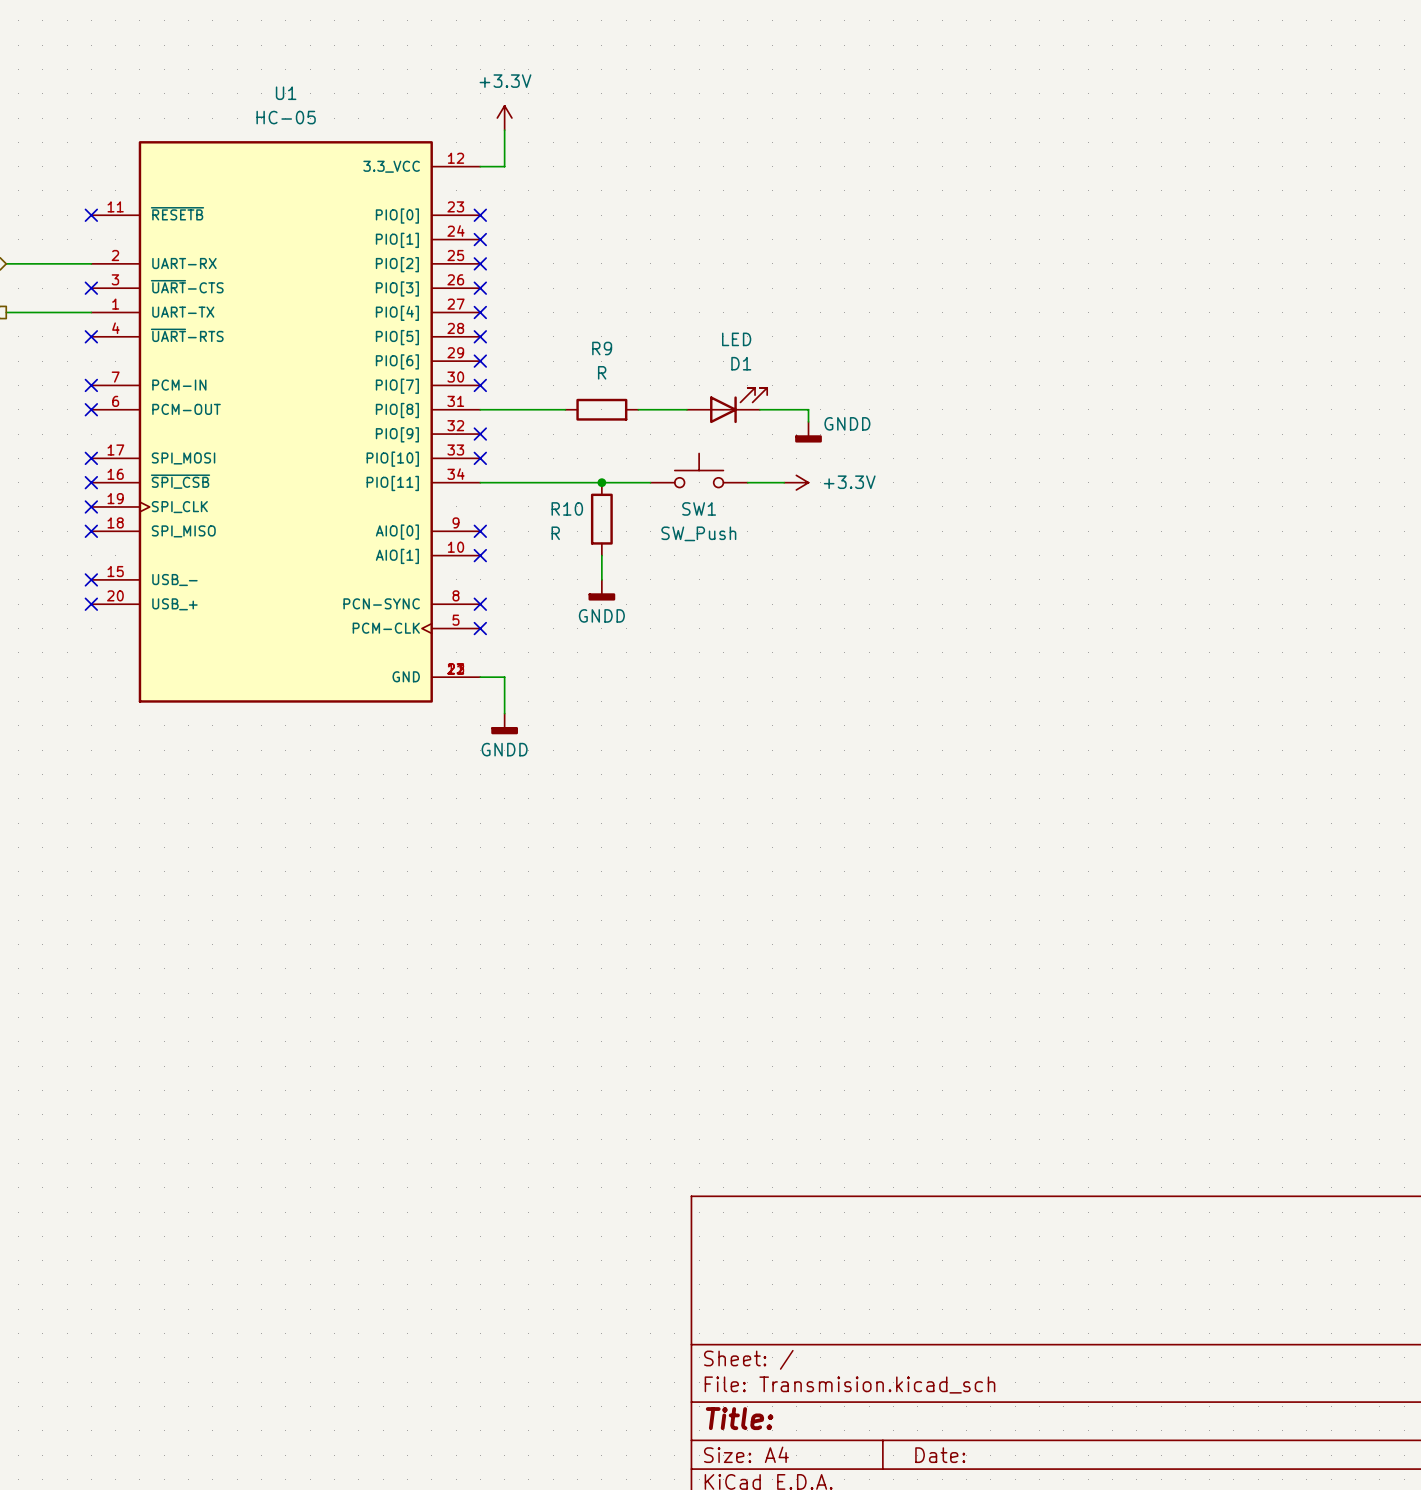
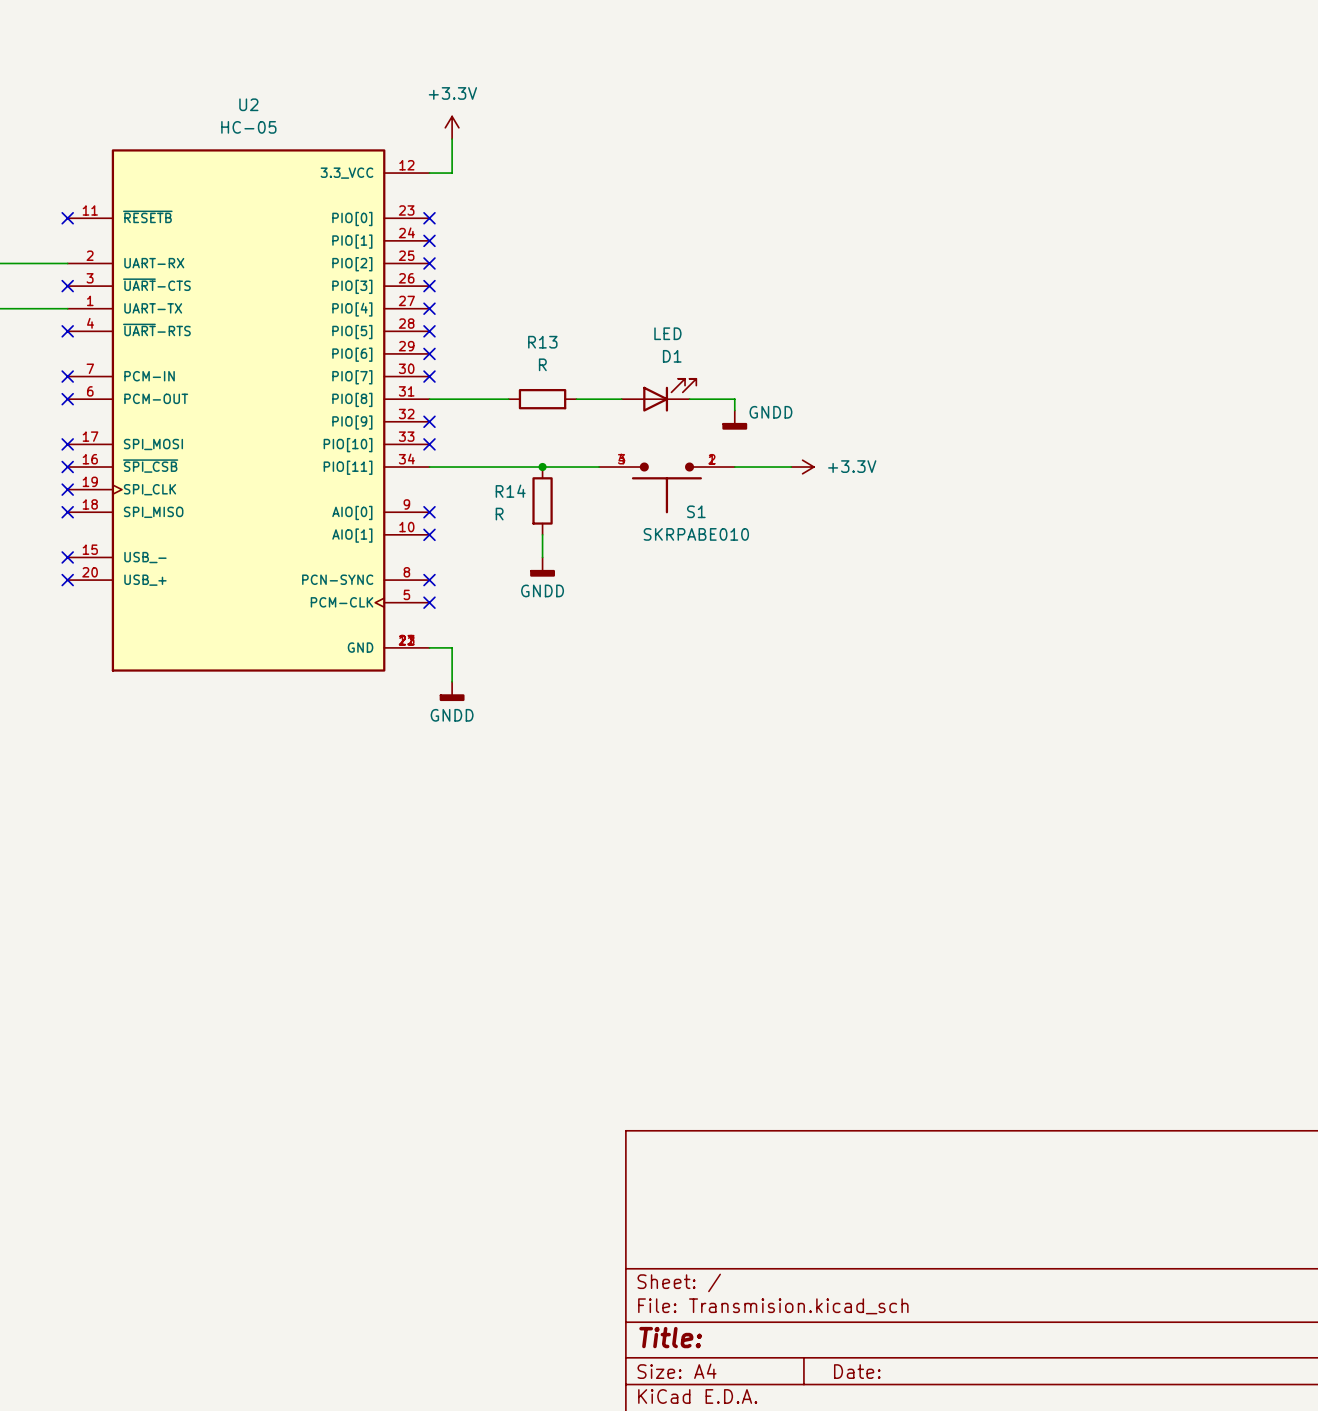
U1 name: U1 (286, 93) -> U2 (248, 104)
R9 name: R9 (602, 348) -> R13 (542, 342)
SW1: SW_Push (699, 470) -> none
power symbol position: +3.3V (796, 482) -> +3.3V (802, 467)
wire: none -> (734, 467) (791, 467)
S1: none -> SKRPABE010 (666, 487)
R10 name: R10 (567, 508) -> R14 (510, 491)

